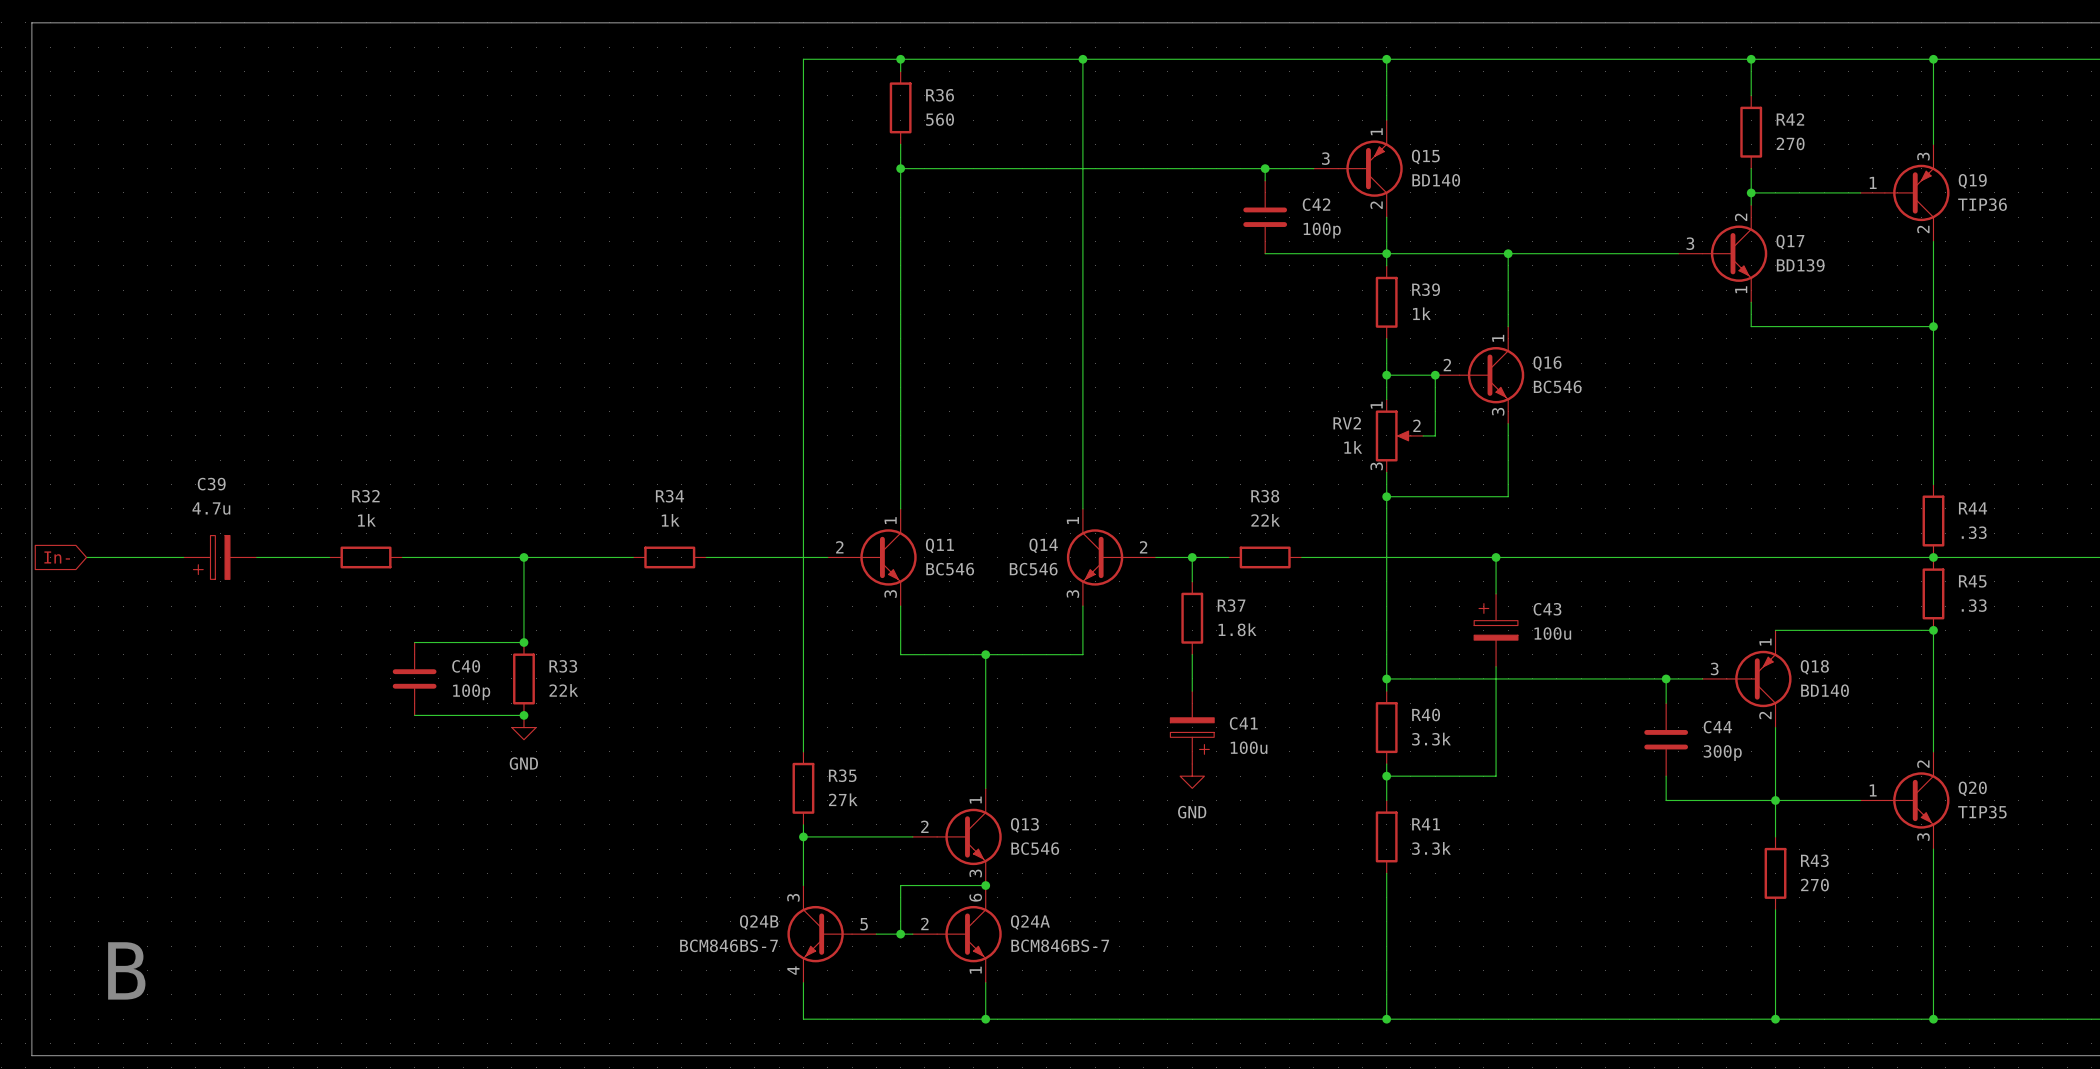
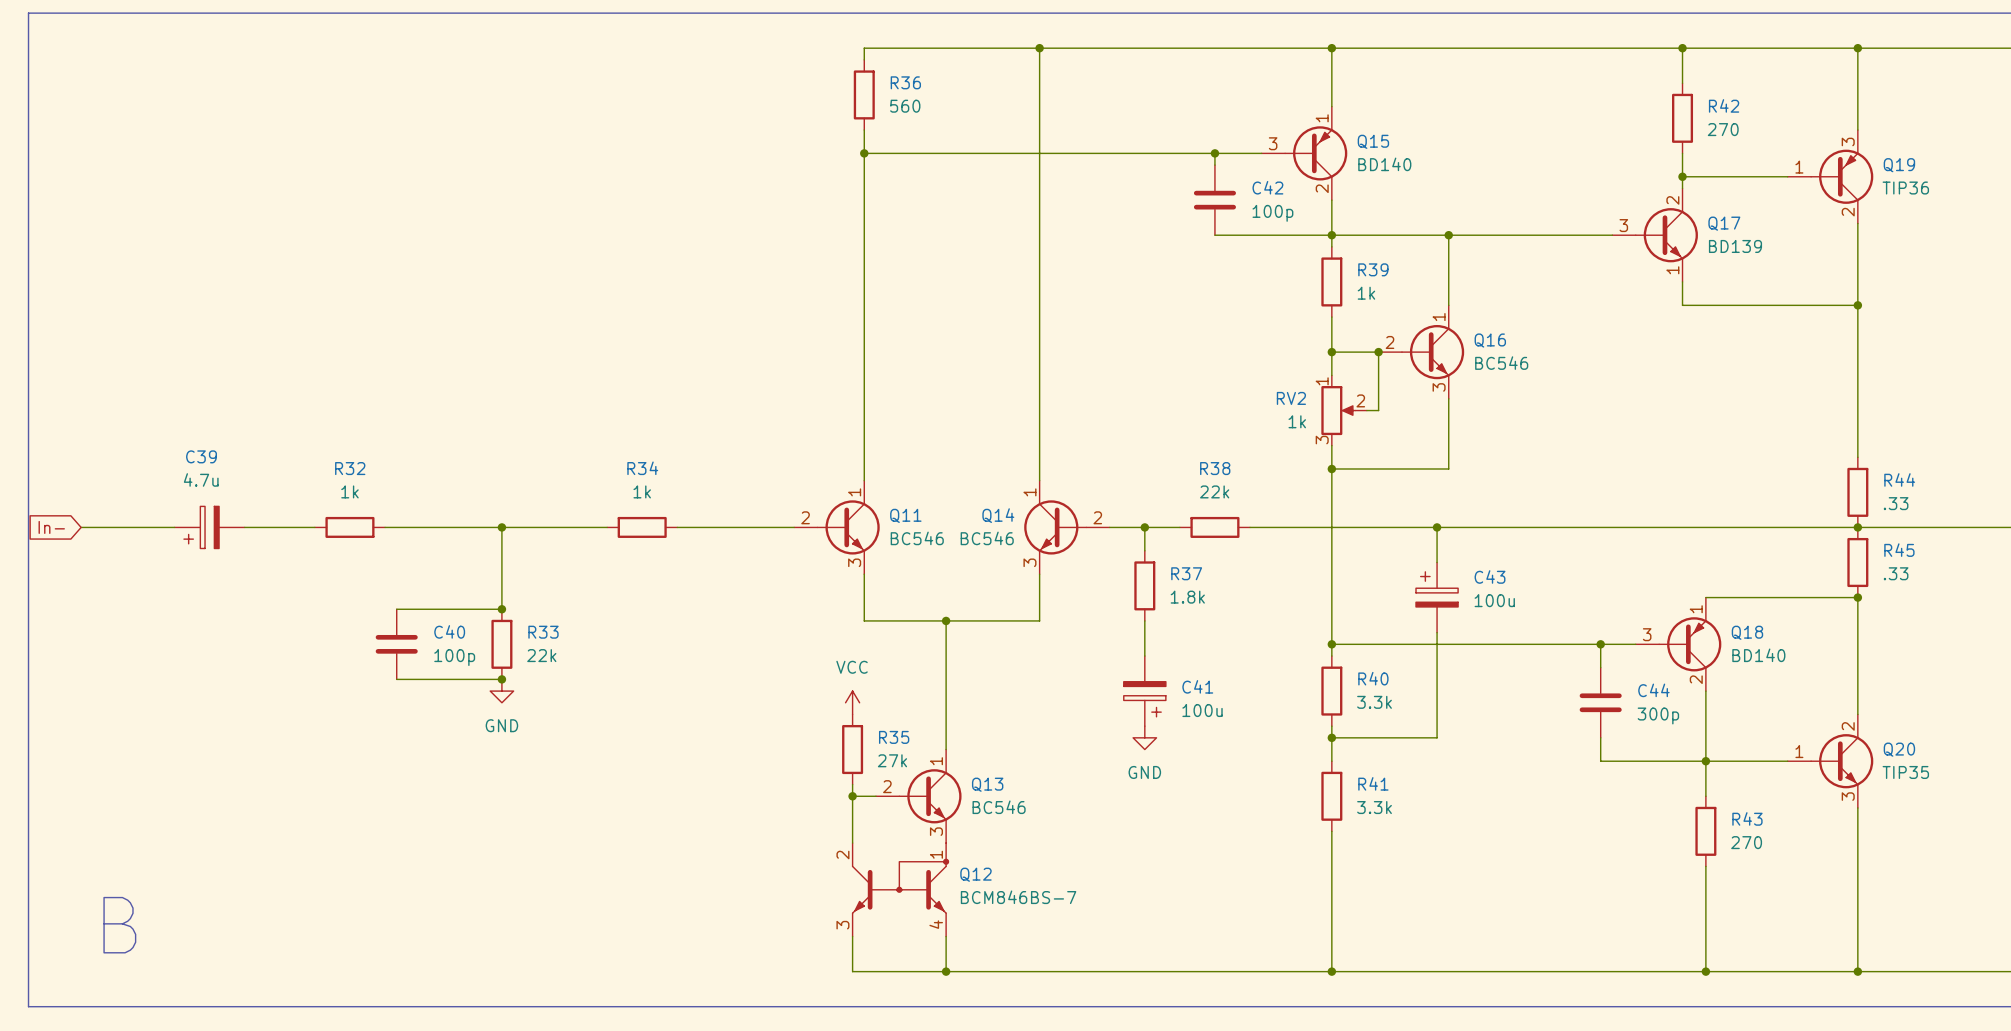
wire: (900, 59) (803, 59) (803, 751) -> none
junction: (900, 59) -> none
power symbol: none -> VCC (852, 702)
R35 position: (803, 788) -> (852, 749)
wire: (803, 824) (803, 885) -> (852, 784) (852, 843)
wire: (803, 836) (888, 836) -> none
junction: (803, 836) -> none
junction: none -> (852, 796)
wire: (985, 885) (900, 885) (900, 934) -> none
junction: (985, 885) -> none
Q24B: BCM846BS-7 (831, 934) -> none
wire: (876, 934) (912, 934) -> none
junction: (900, 934) -> none
Q12: none -> BCM846BS-7 (900, 889)
Q24A: BCM846BS-7 (957, 934) -> none
wire: (803, 982) (803, 1019) (888, 1019) -> (852, 936) (852, 971)

